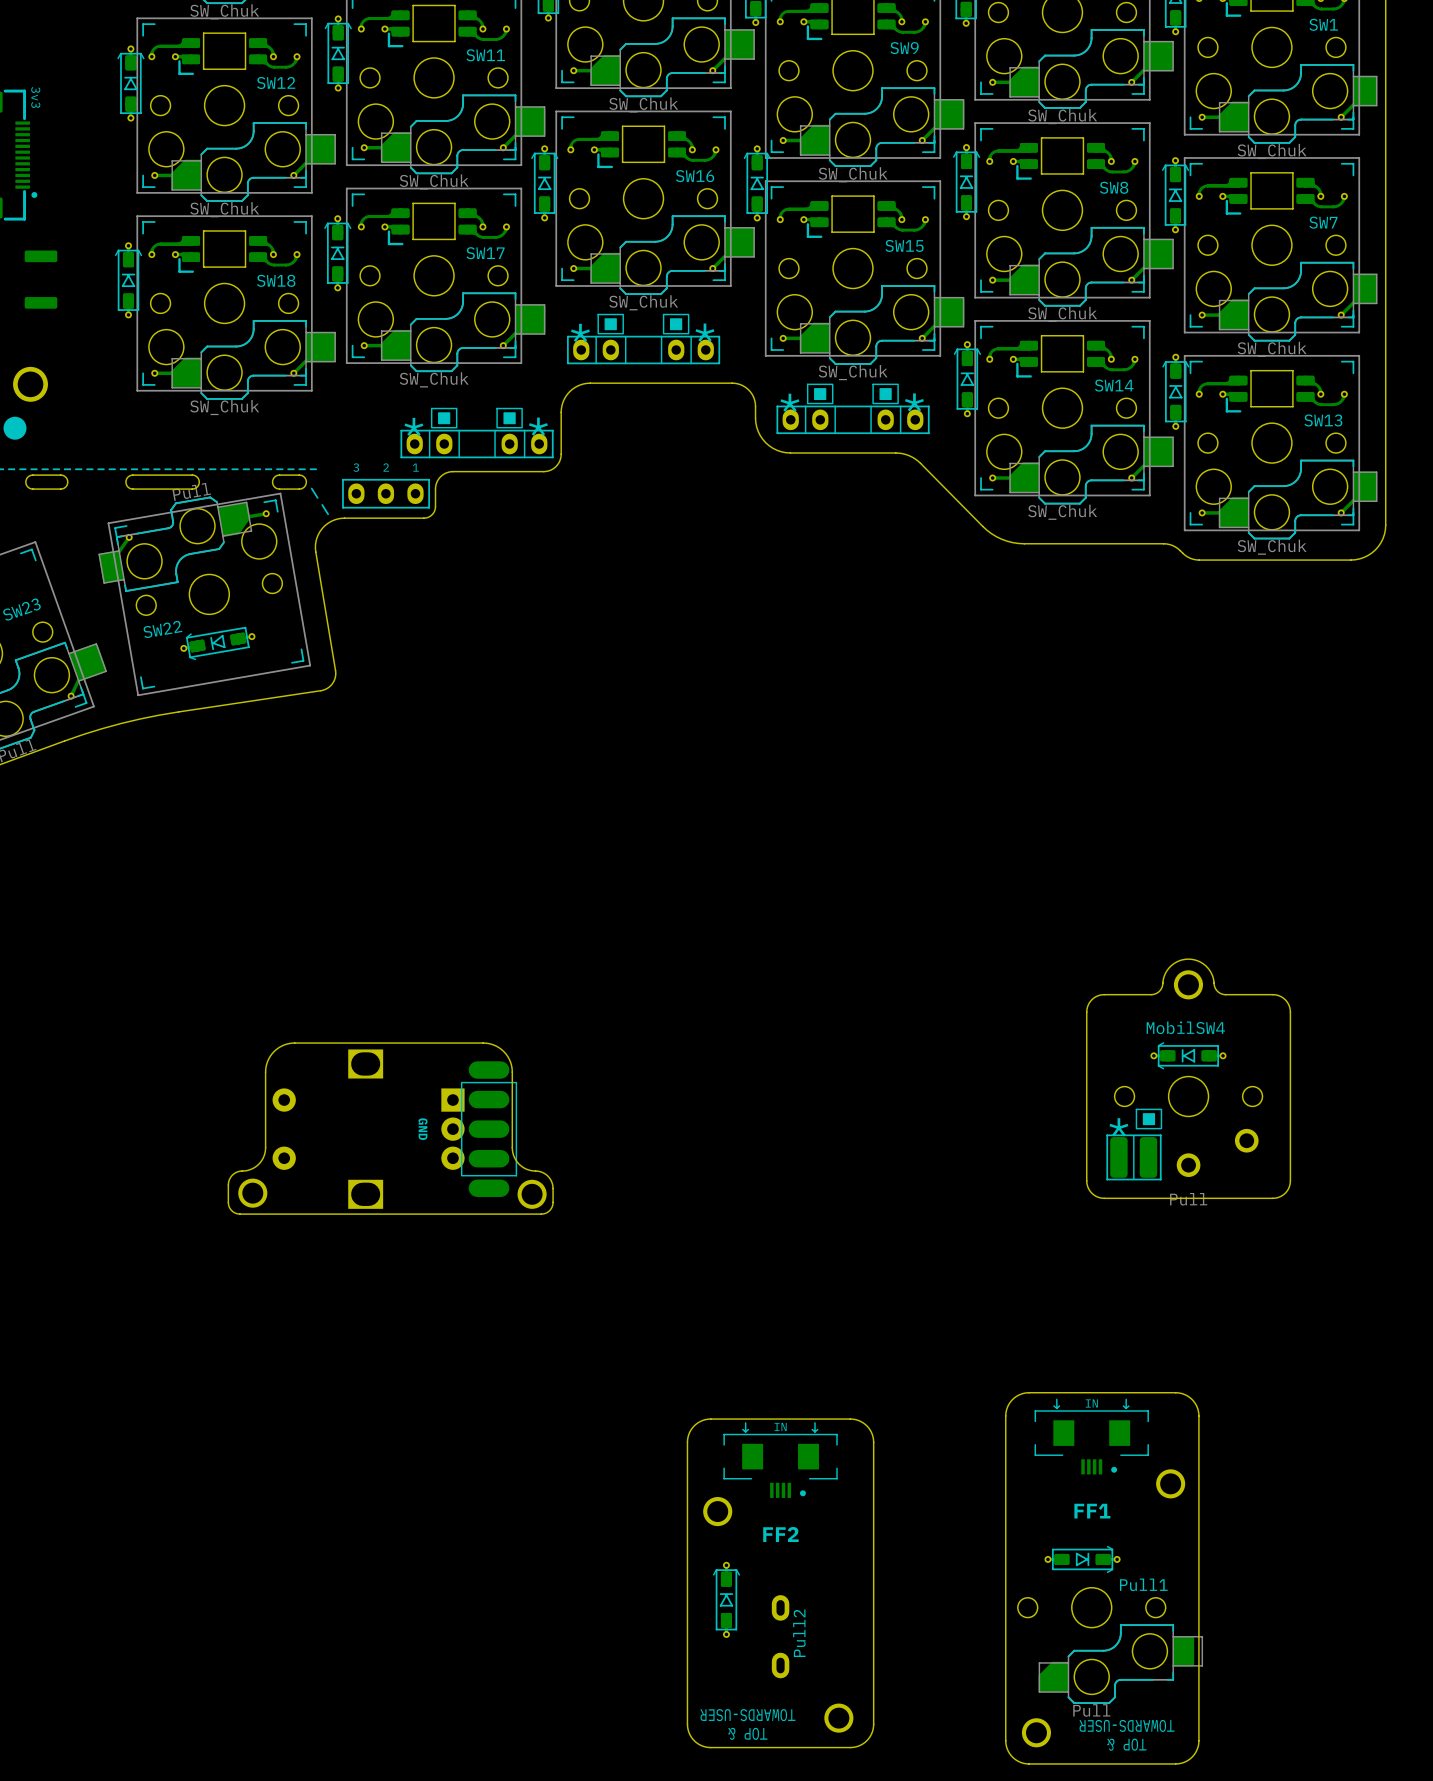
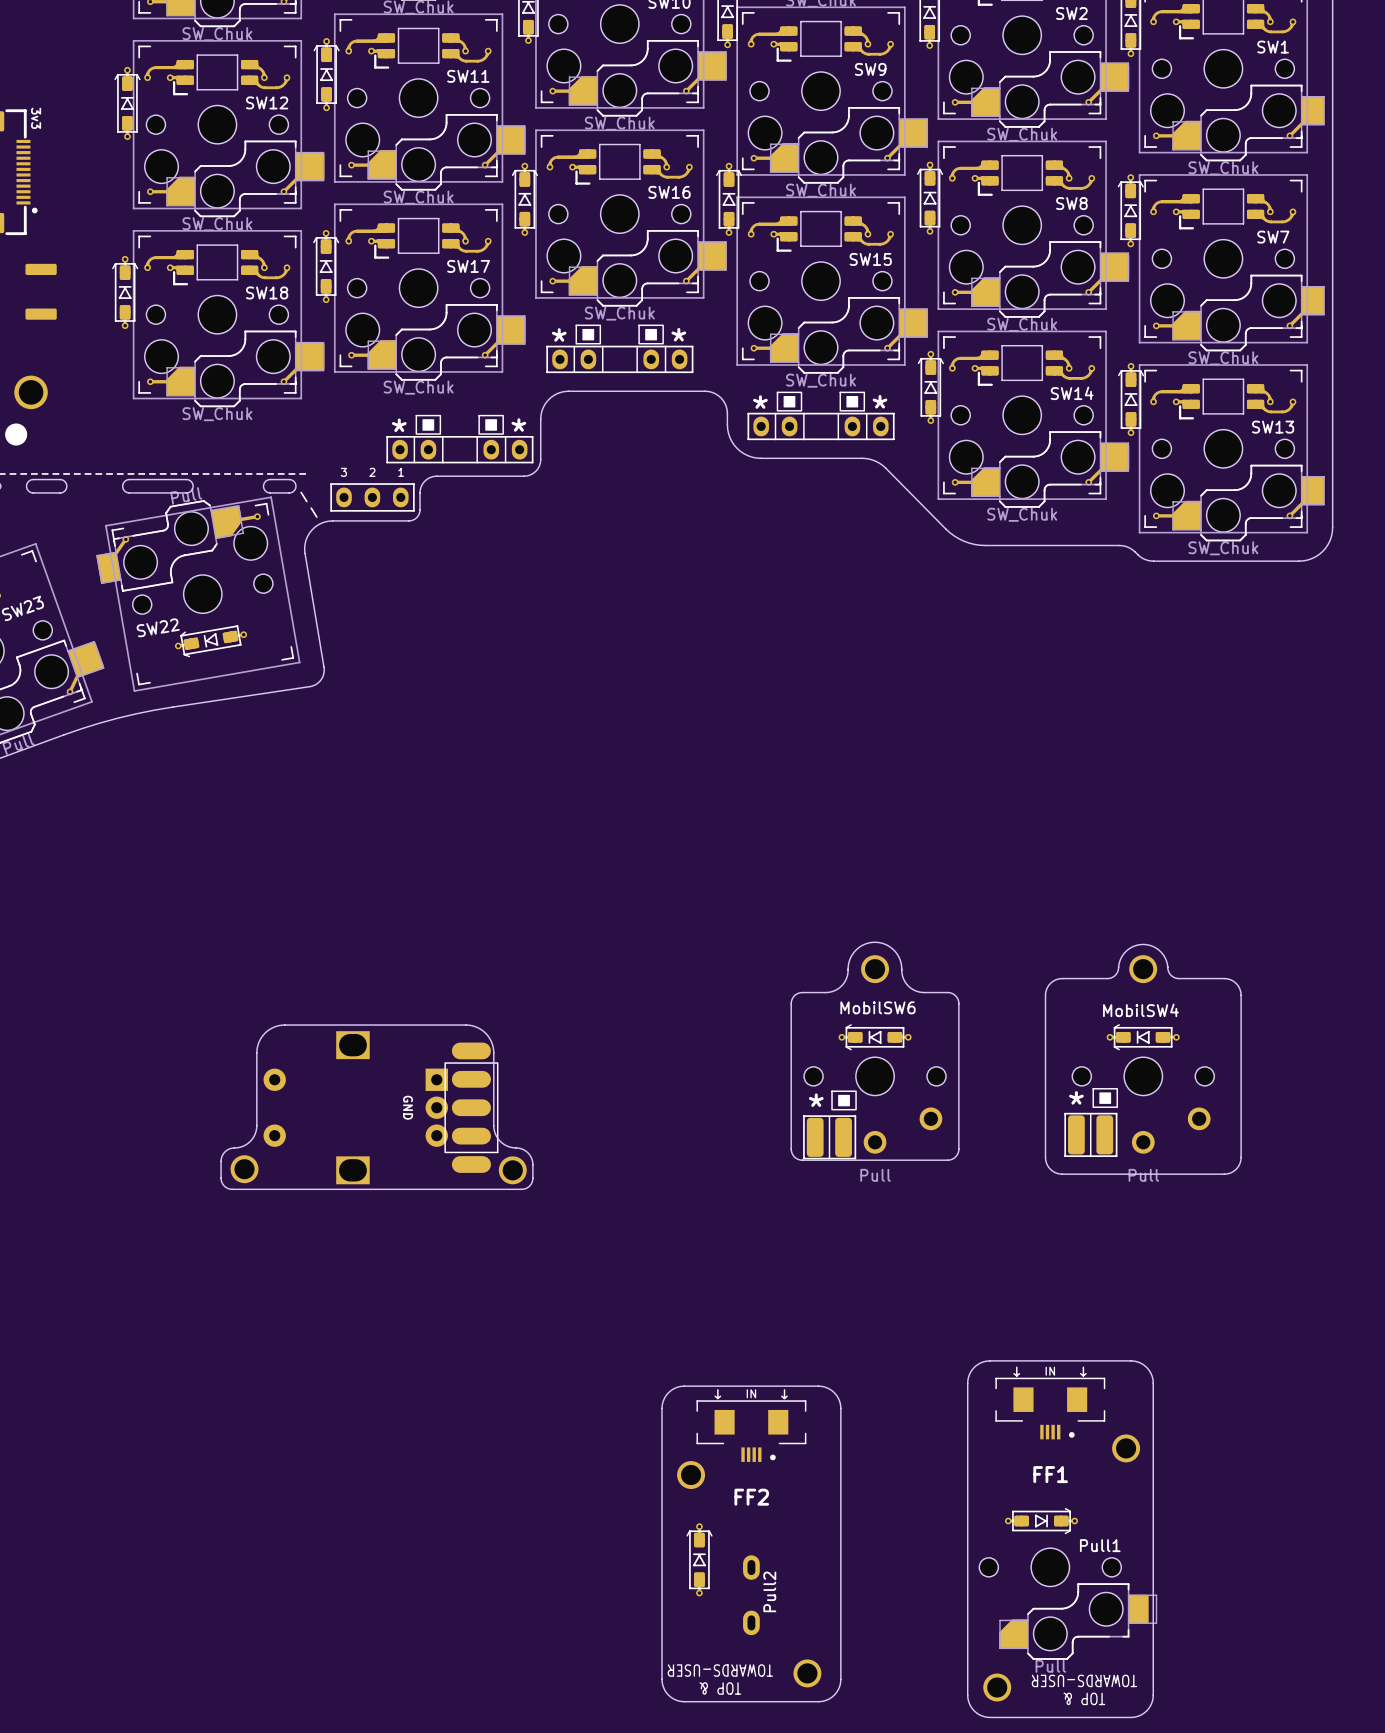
part: none -> (875, 969)
board edge: none -> (901, 969) (904, 981) (912, 989) (921, 992) (950, 992) (958, 1000) (957, 1153) (953, 1158) (947, 1160) (797, 1159) (792, 1154) (791, 1149) (792, 998) (799, 992) (828, 992) (839, 987) (846, 977) (848, 962) (852, 953) (859, 947) (868, 943) (881, 943) (892, 949) (900, 959) (901, 969)
part: none -> (875, 1037)
MobilSW6: none -> Pull (875, 1105)
part: none -> (829, 1125)

